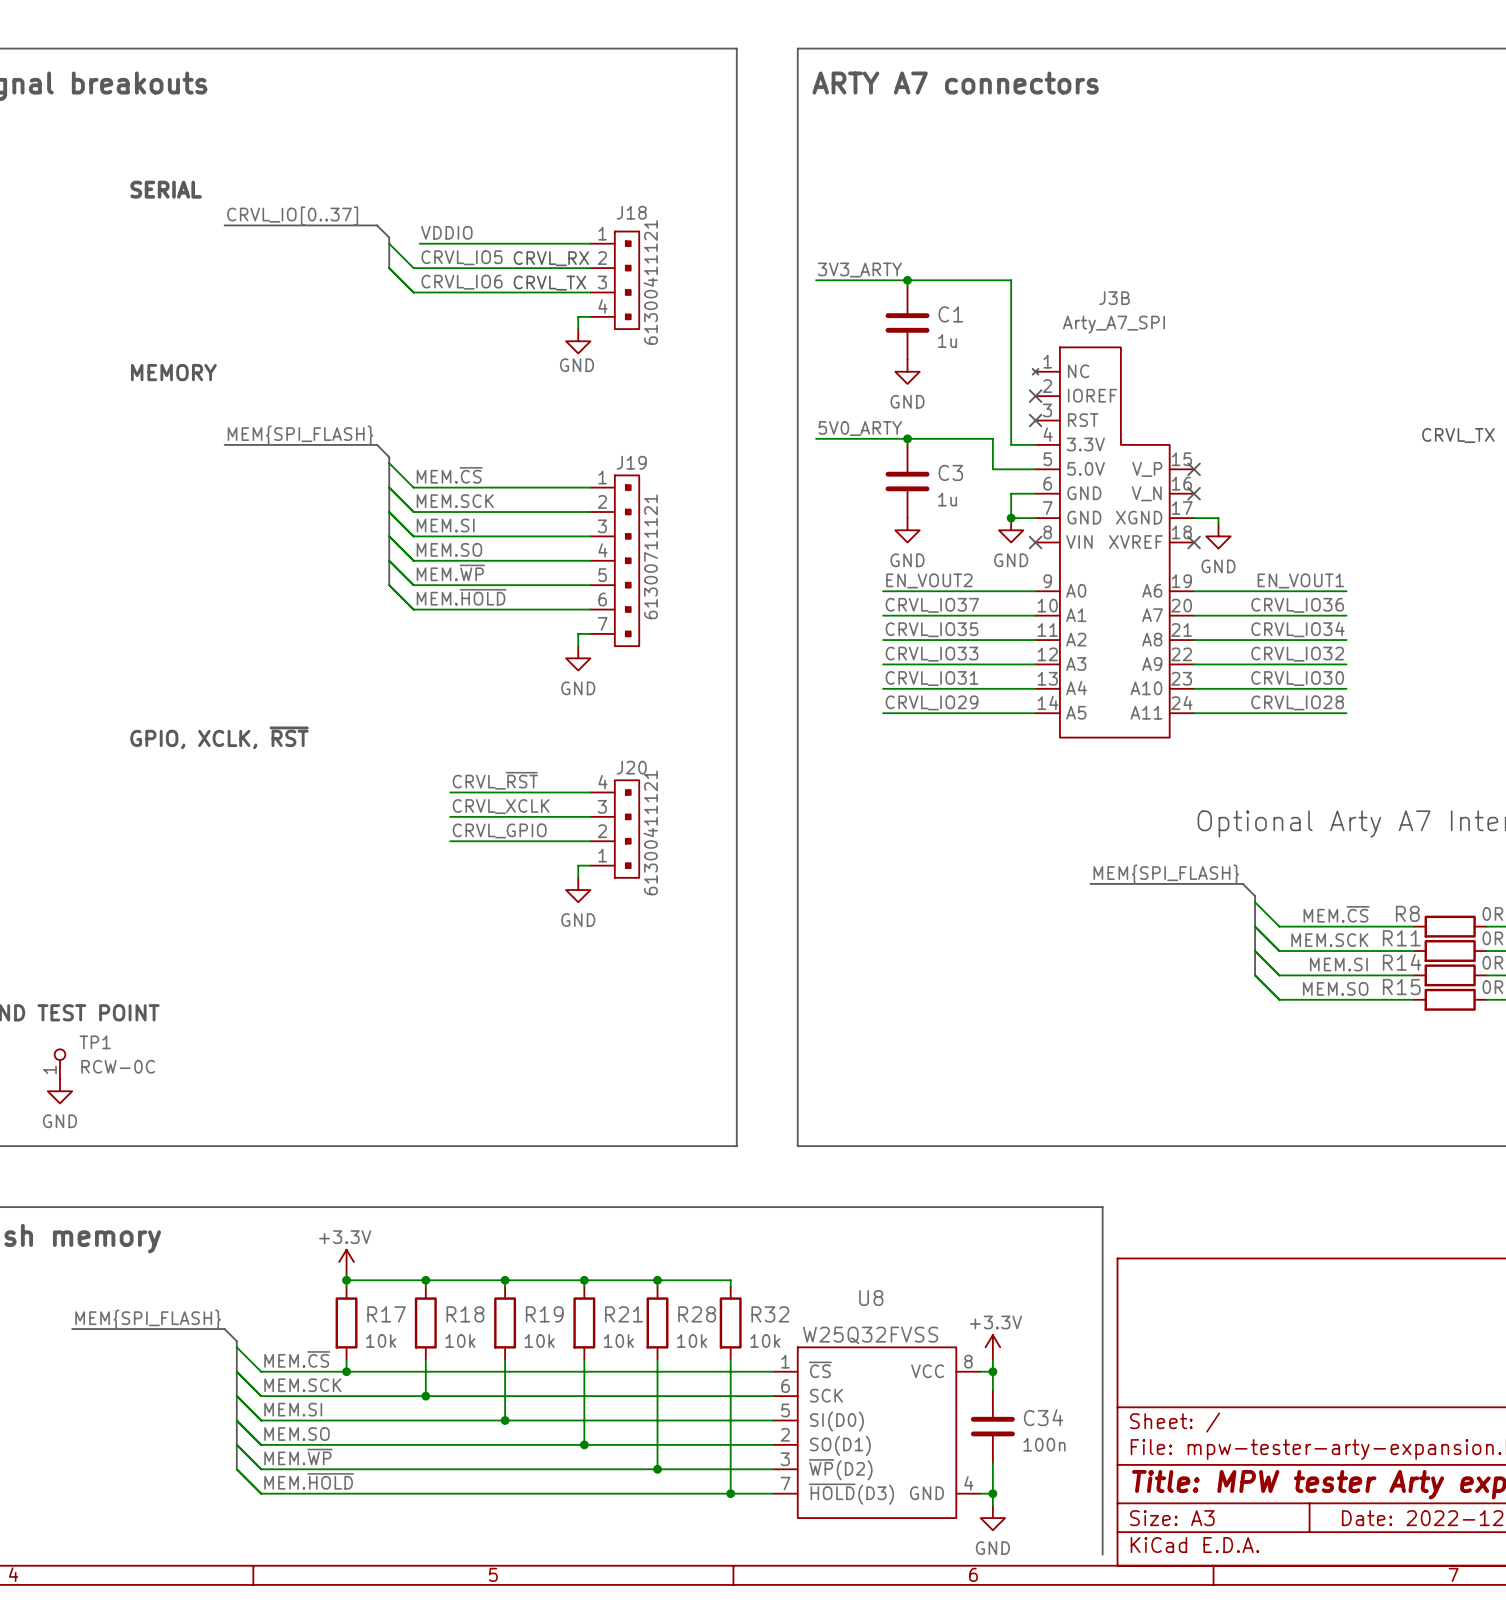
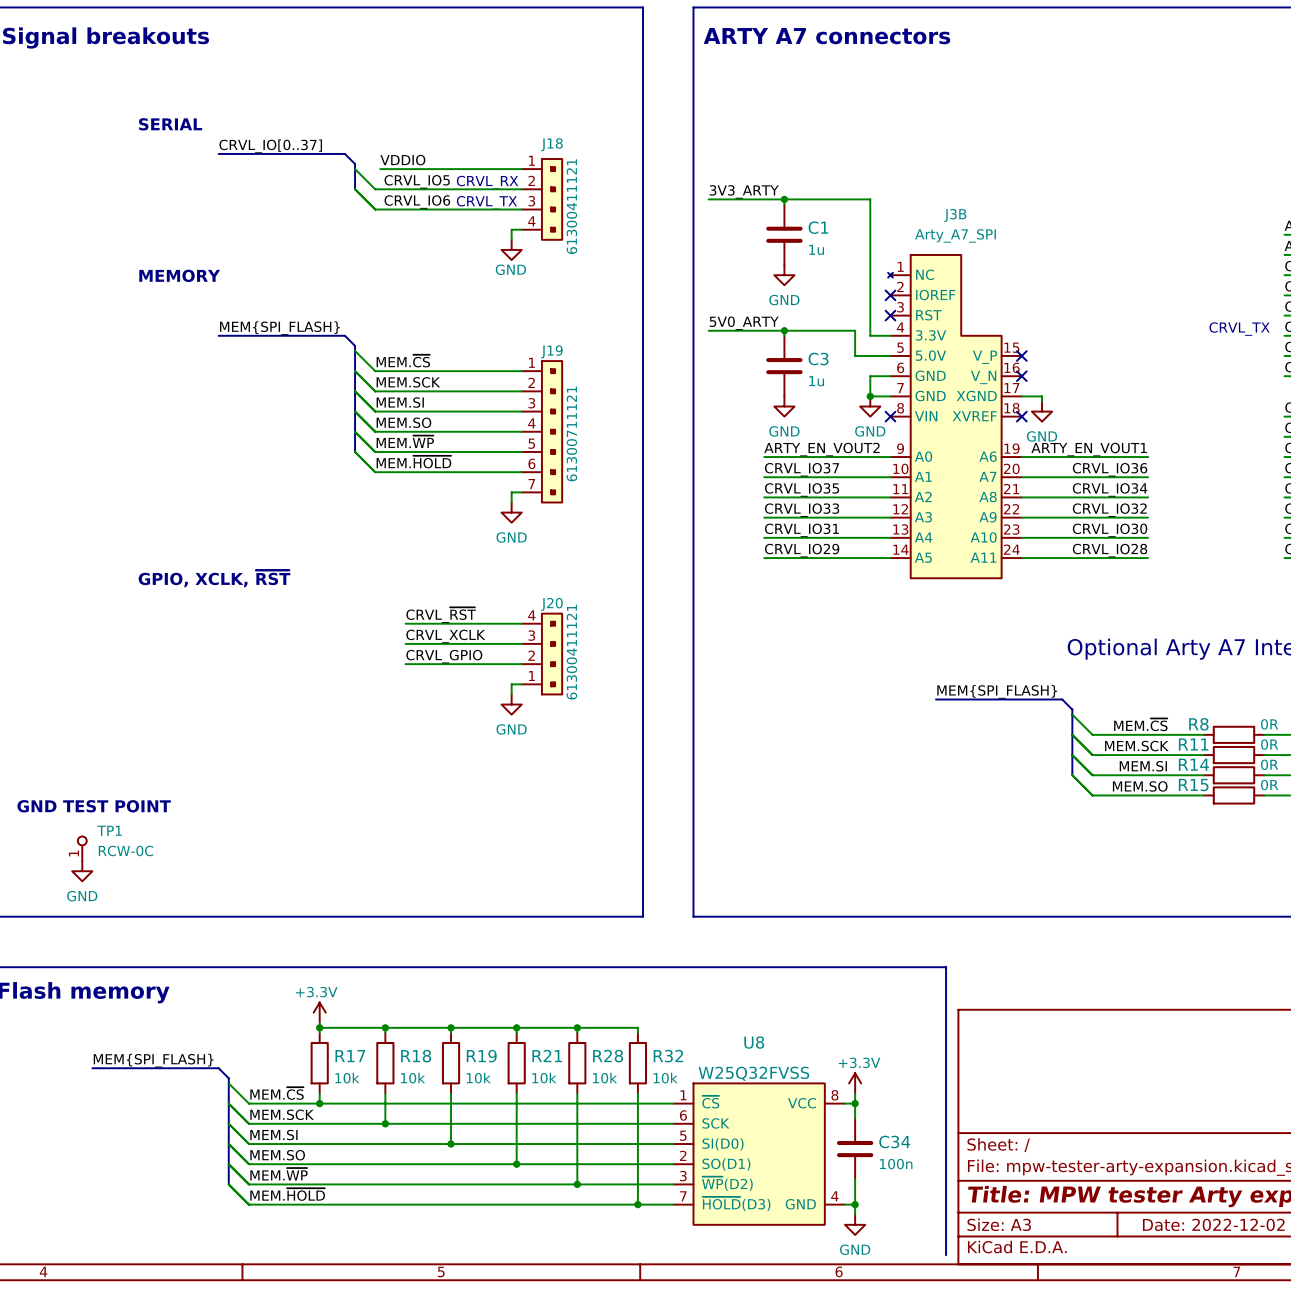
label: EN_VOUT2 (929, 580) -> ARTY_EN_VOUT2 (821, 449)
label: EN_VOUT1 (1300, 580) -> ARTY_EN_VOUT1 (1089, 449)

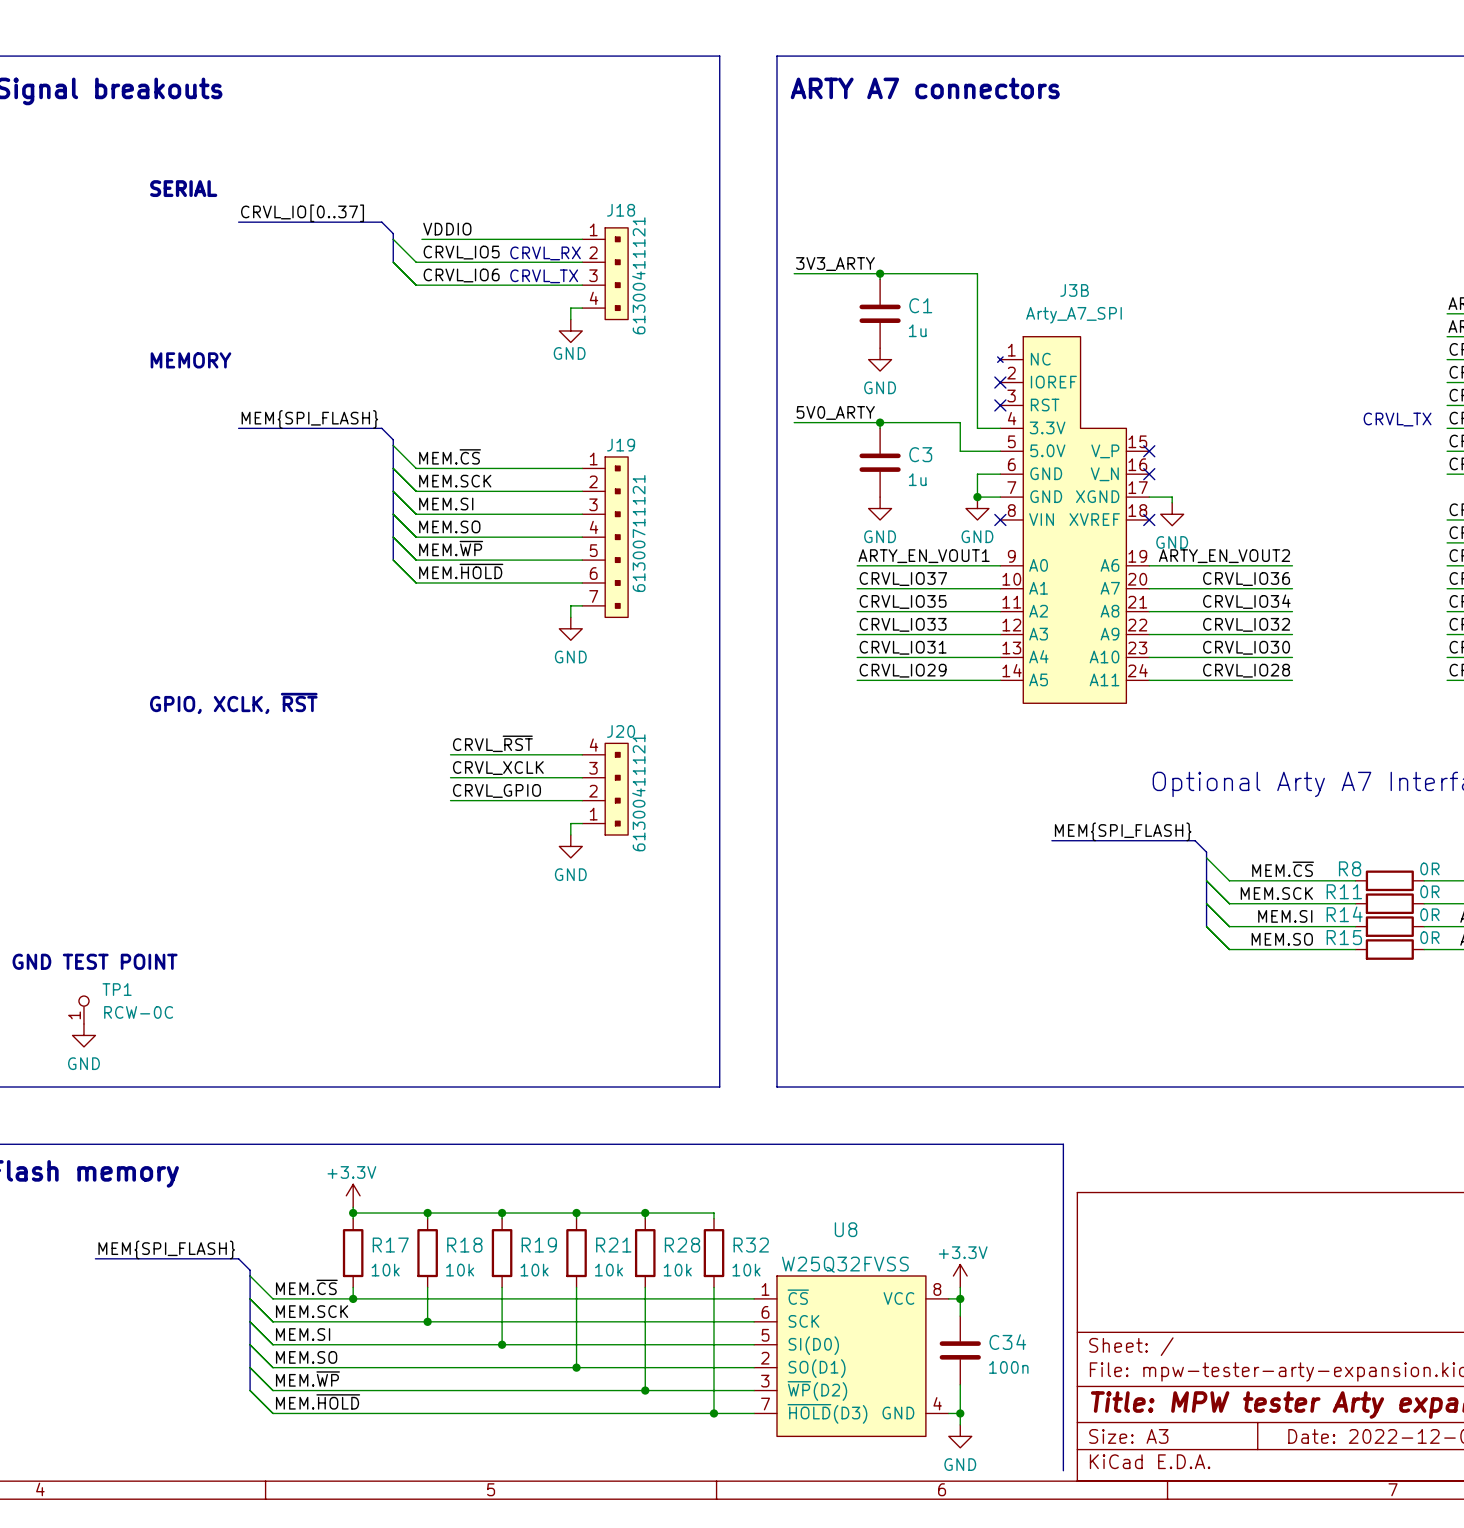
label: ARTY_EN_VOUT2 (821, 449) -> ARTY_EN_VOUT1 (924, 556)
label: ARTY_EN_VOUT1 (1089, 449) -> ARTY_EN_VOUT2 (1224, 556)

